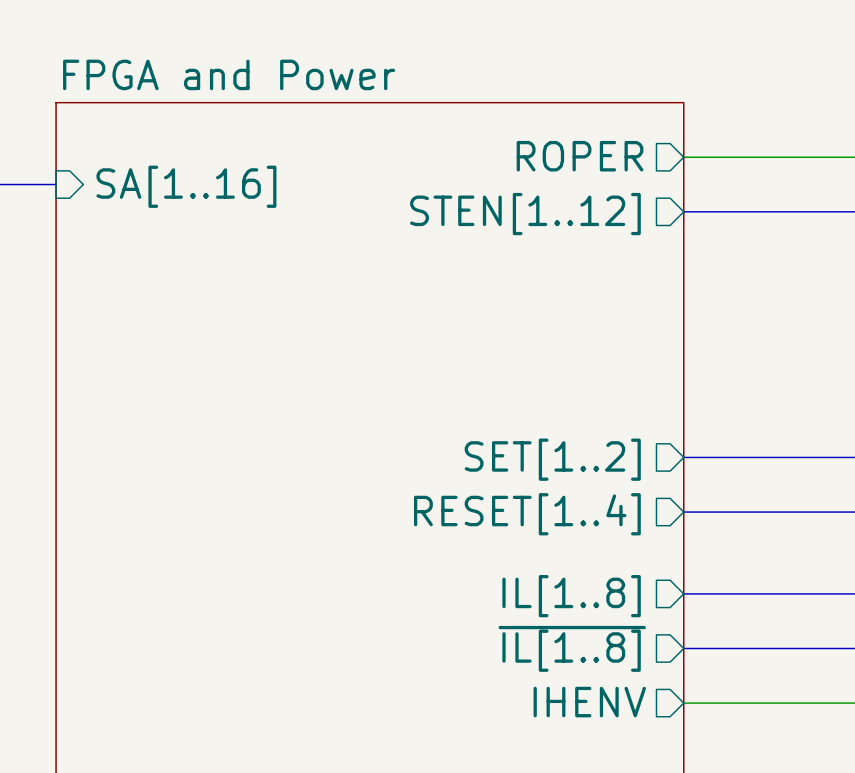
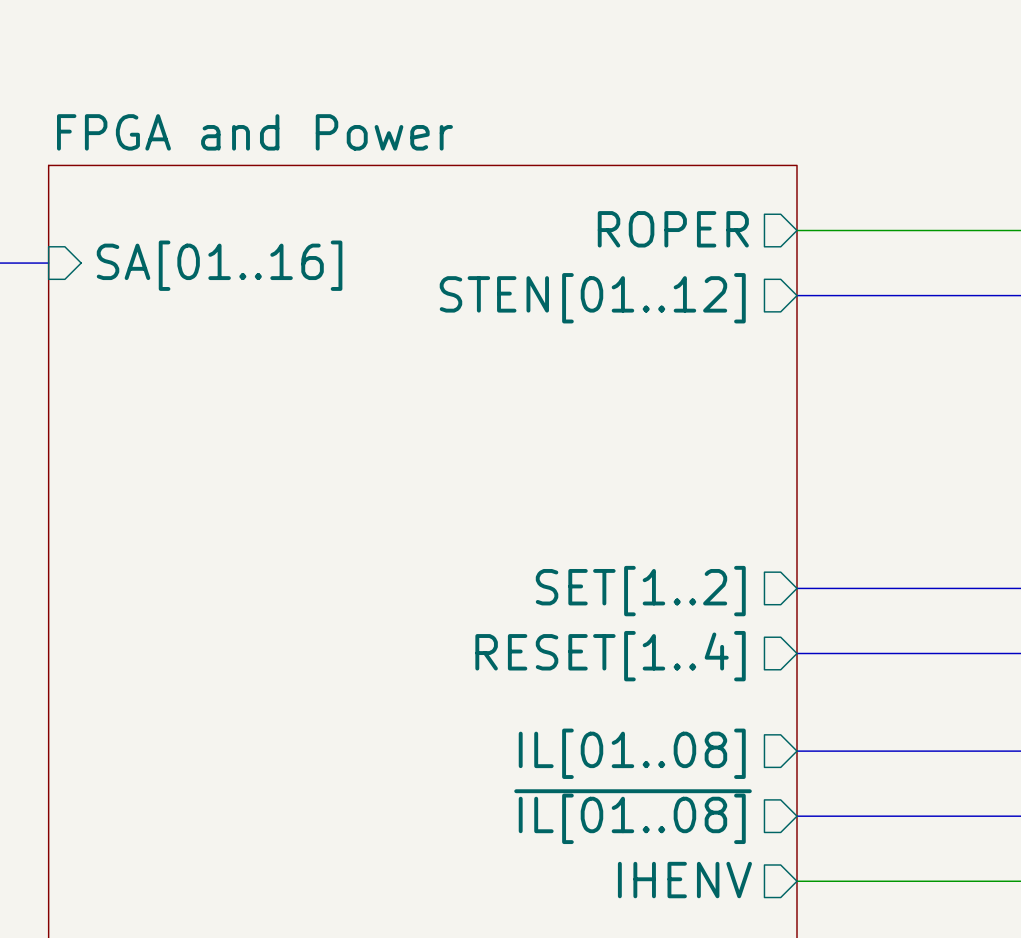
sheet pin: SA[1..16] (186, 186) -> SA[01..16] (219, 265)
sheet pin: STEN[1..12] (525, 214) -> STEN[01..12] (592, 298)
sheet pin: IL[1..8] (571, 596) -> IL[01..08] (632, 753)
sheet pin: ~{IL[1..8]} (572, 648) -> ~{IL[01..08]} (633, 816)

